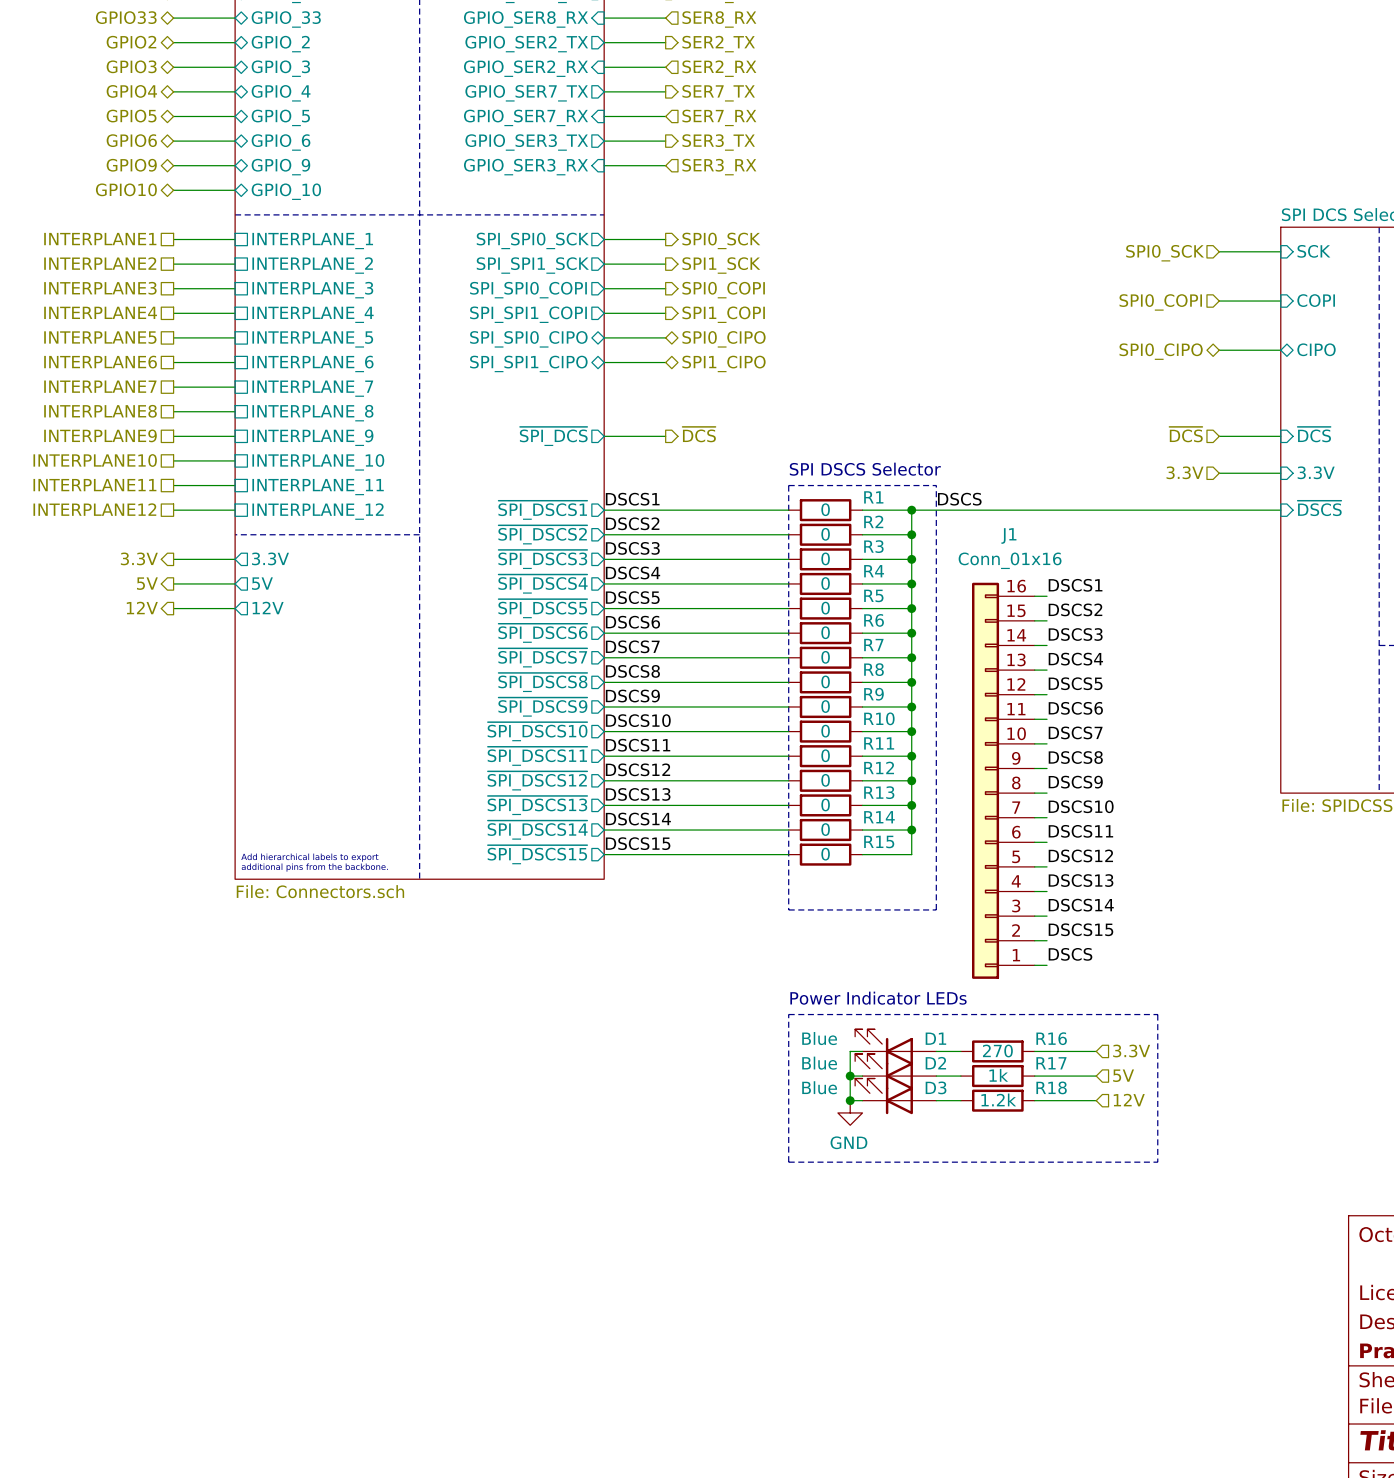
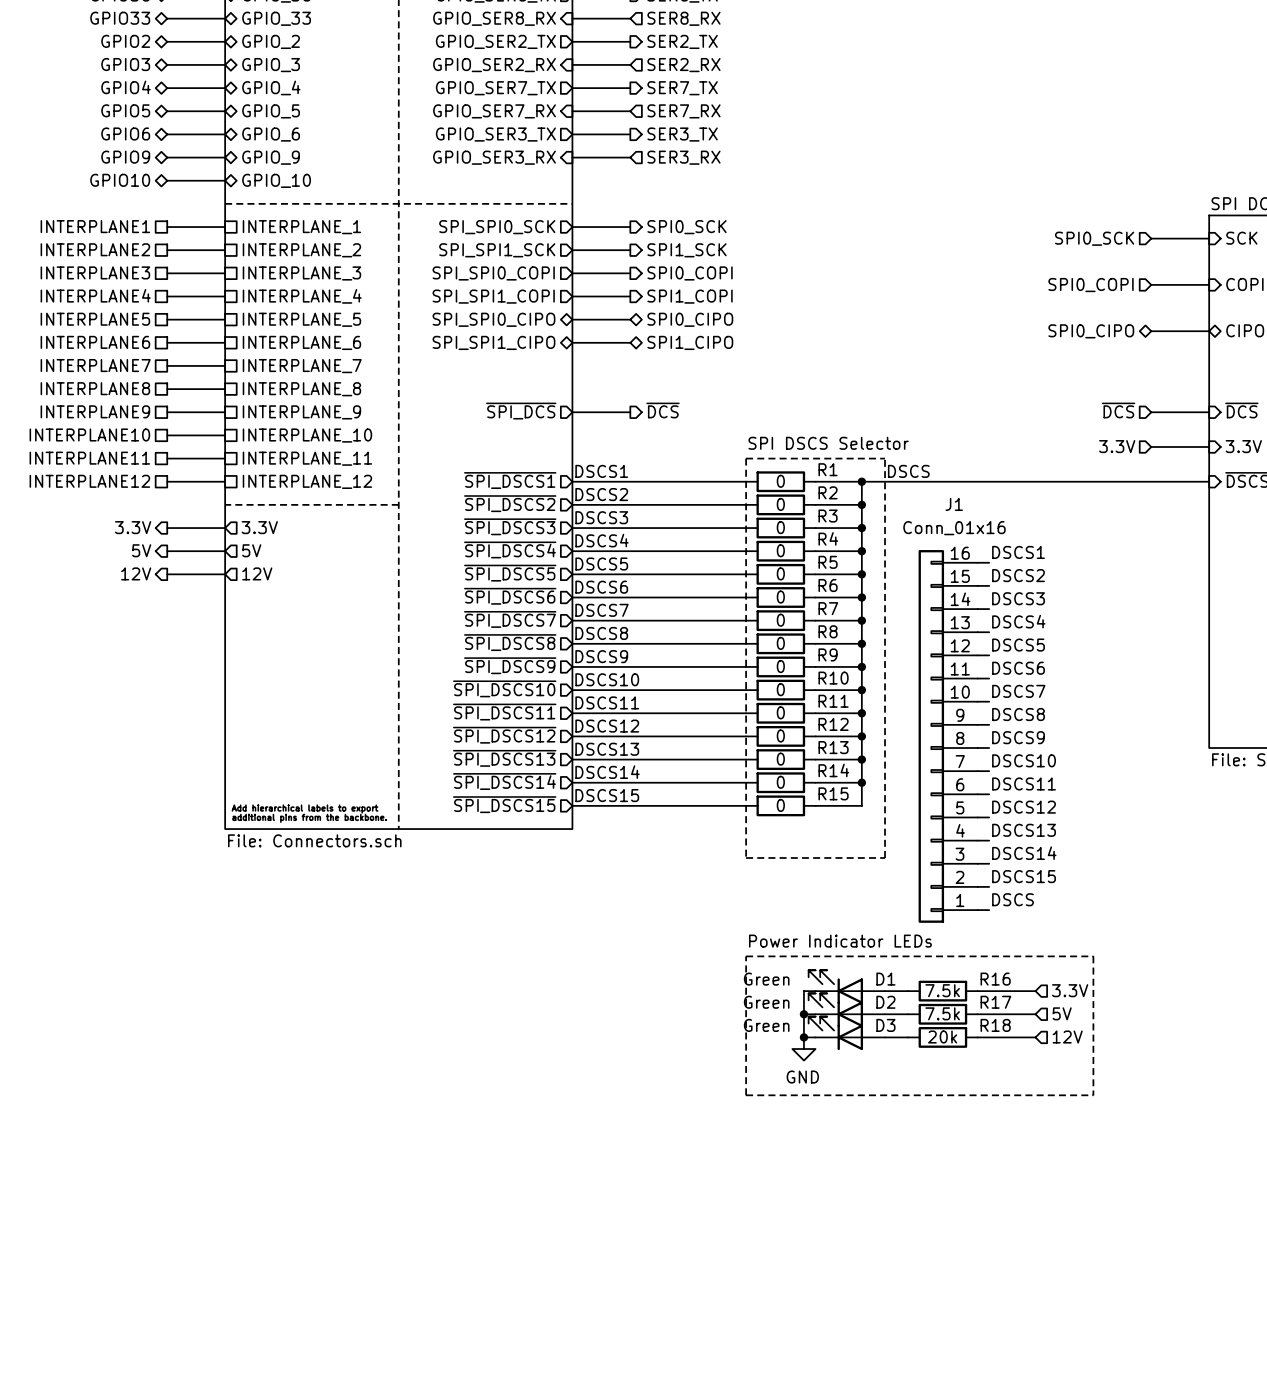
D1 value: Blue (819, 1038) -> Green (766, 979)
R16 value: 270 (997, 1051) -> 7.5k (942, 990)
D2 value: Blue (819, 1063) -> Green (766, 1002)
R17 value: 1k (998, 1075) -> 7.5k (942, 1013)
D3 value: Blue (819, 1087) -> Green (766, 1025)
R18 value: 1.2k (998, 1099) -> 20k (942, 1037)

